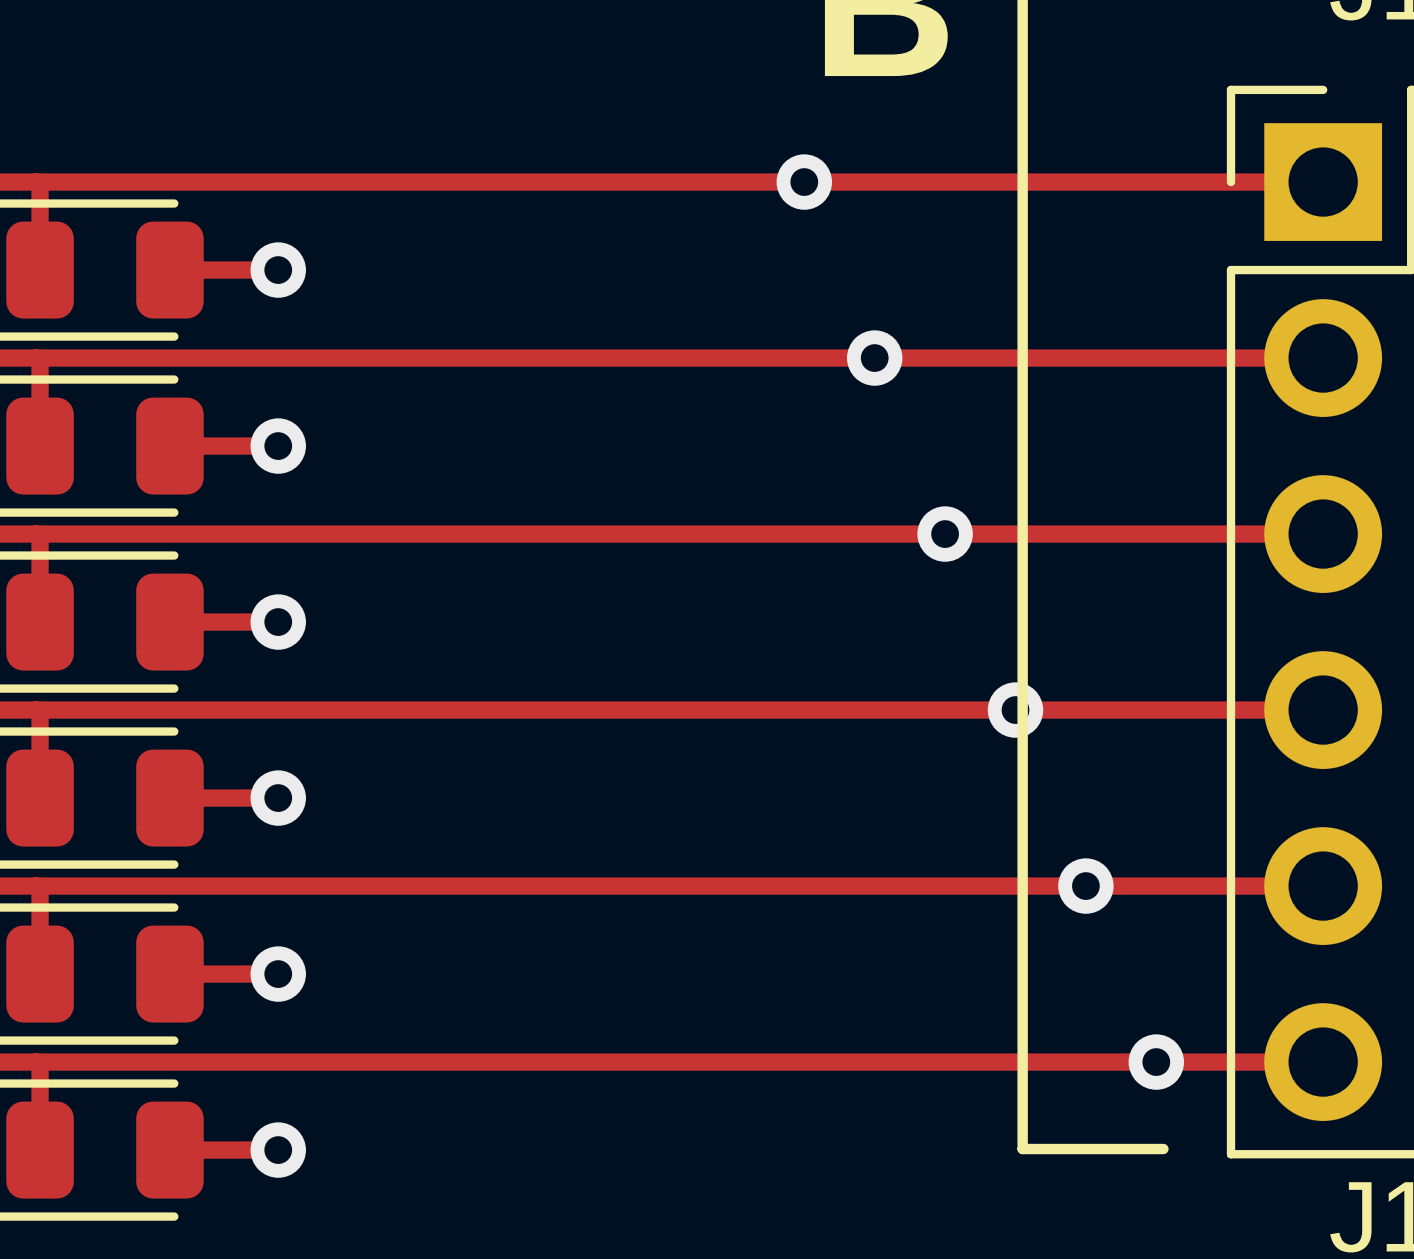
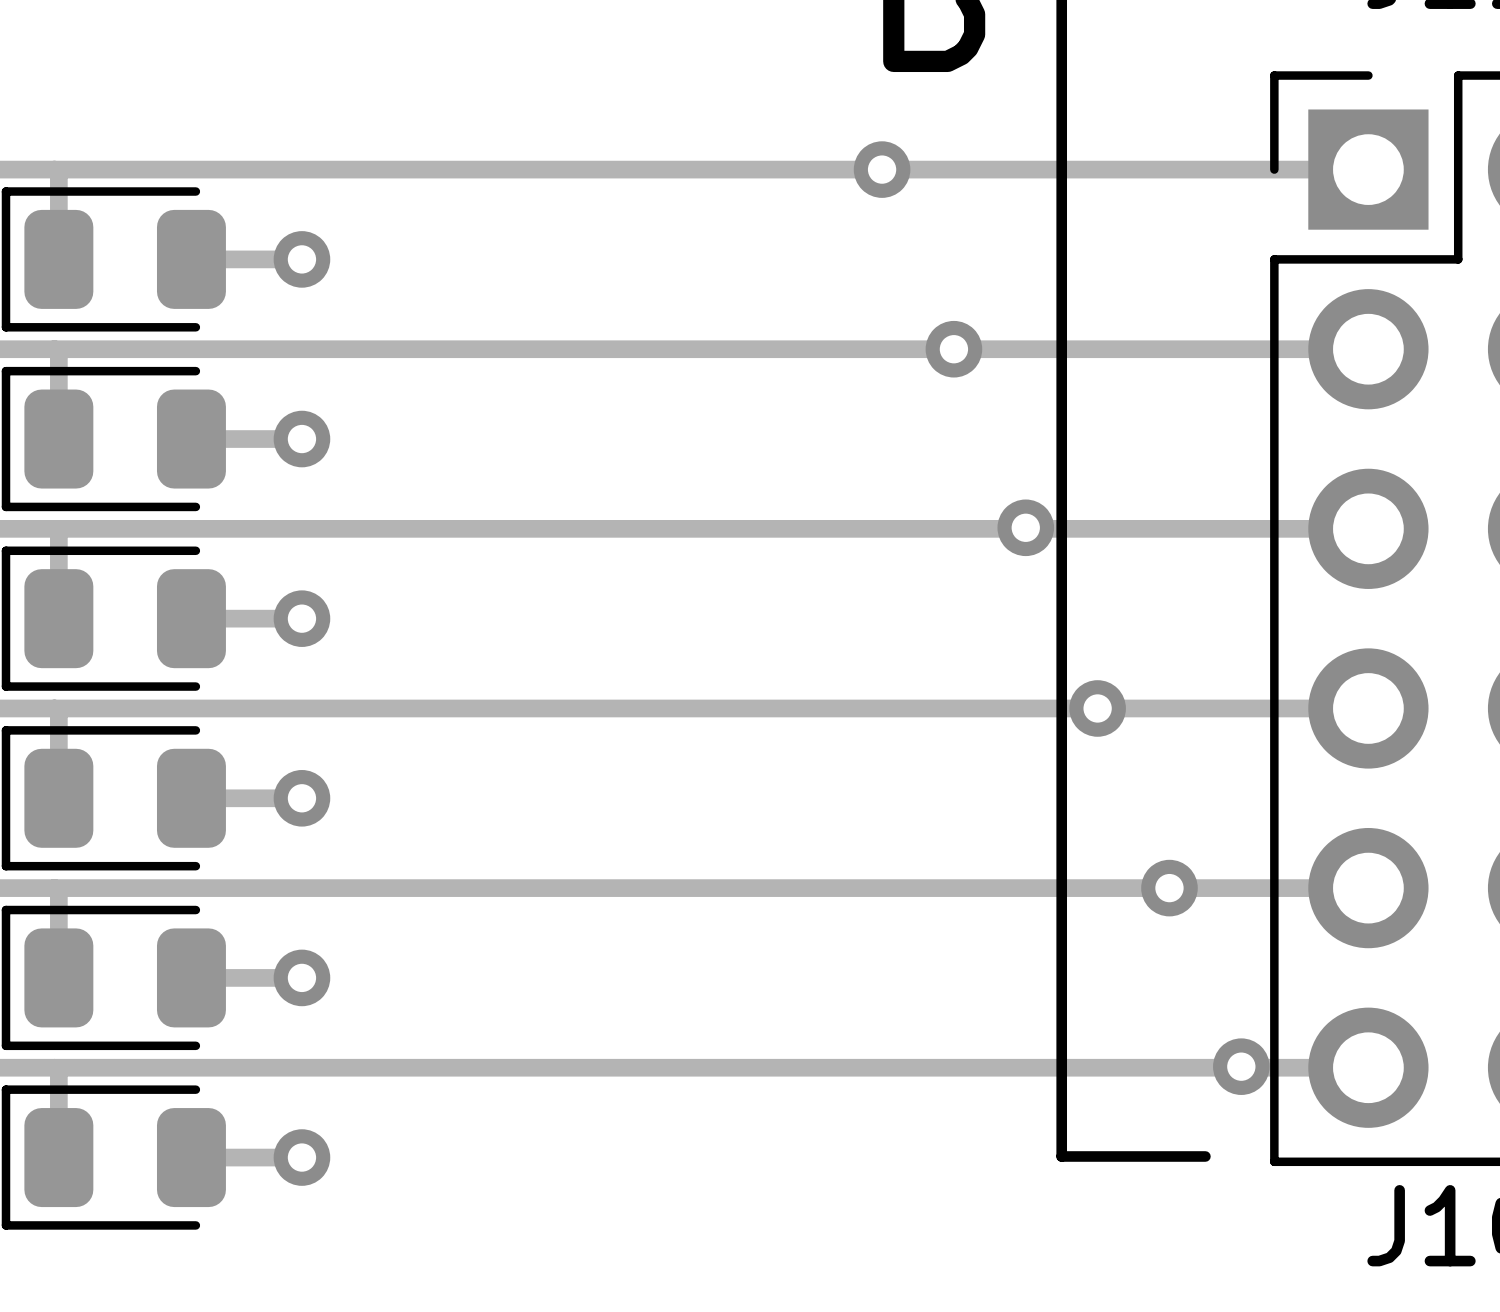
via position: (804, 182) -> (882, 169)
via position: (874, 358) -> (953, 349)
via position: (945, 534) -> (1025, 527)
via position: (1015, 710) -> (1097, 708)
via position: (1085, 886) -> (1169, 888)
via position: (1156, 1062) -> (1241, 1066)

